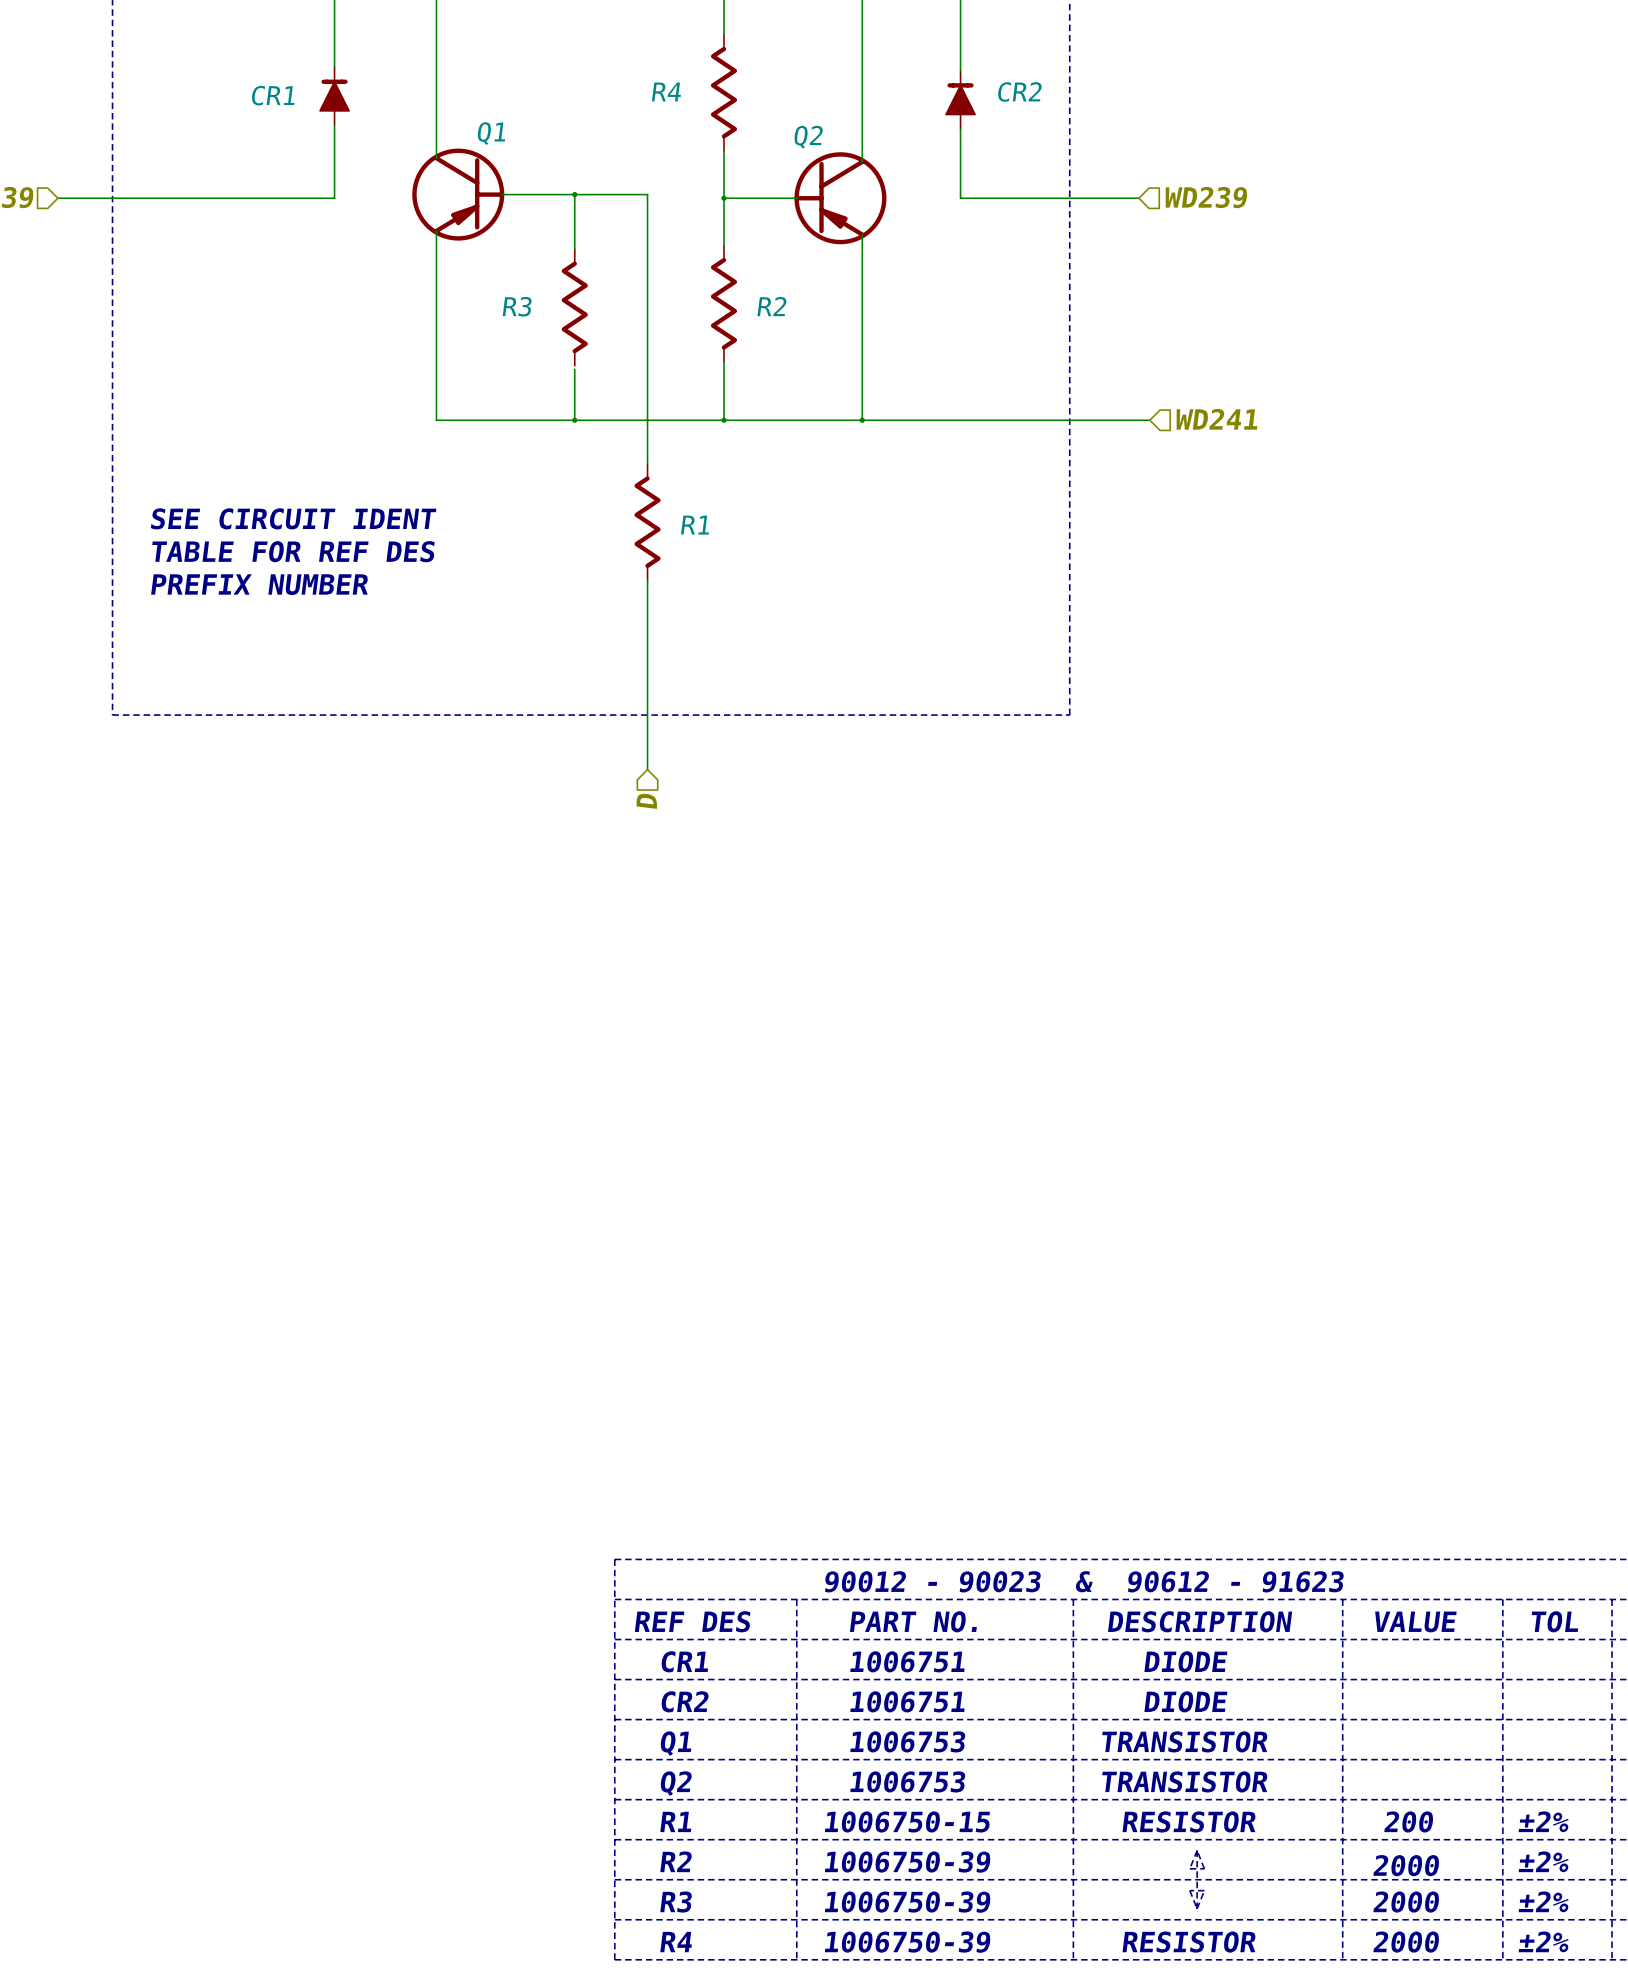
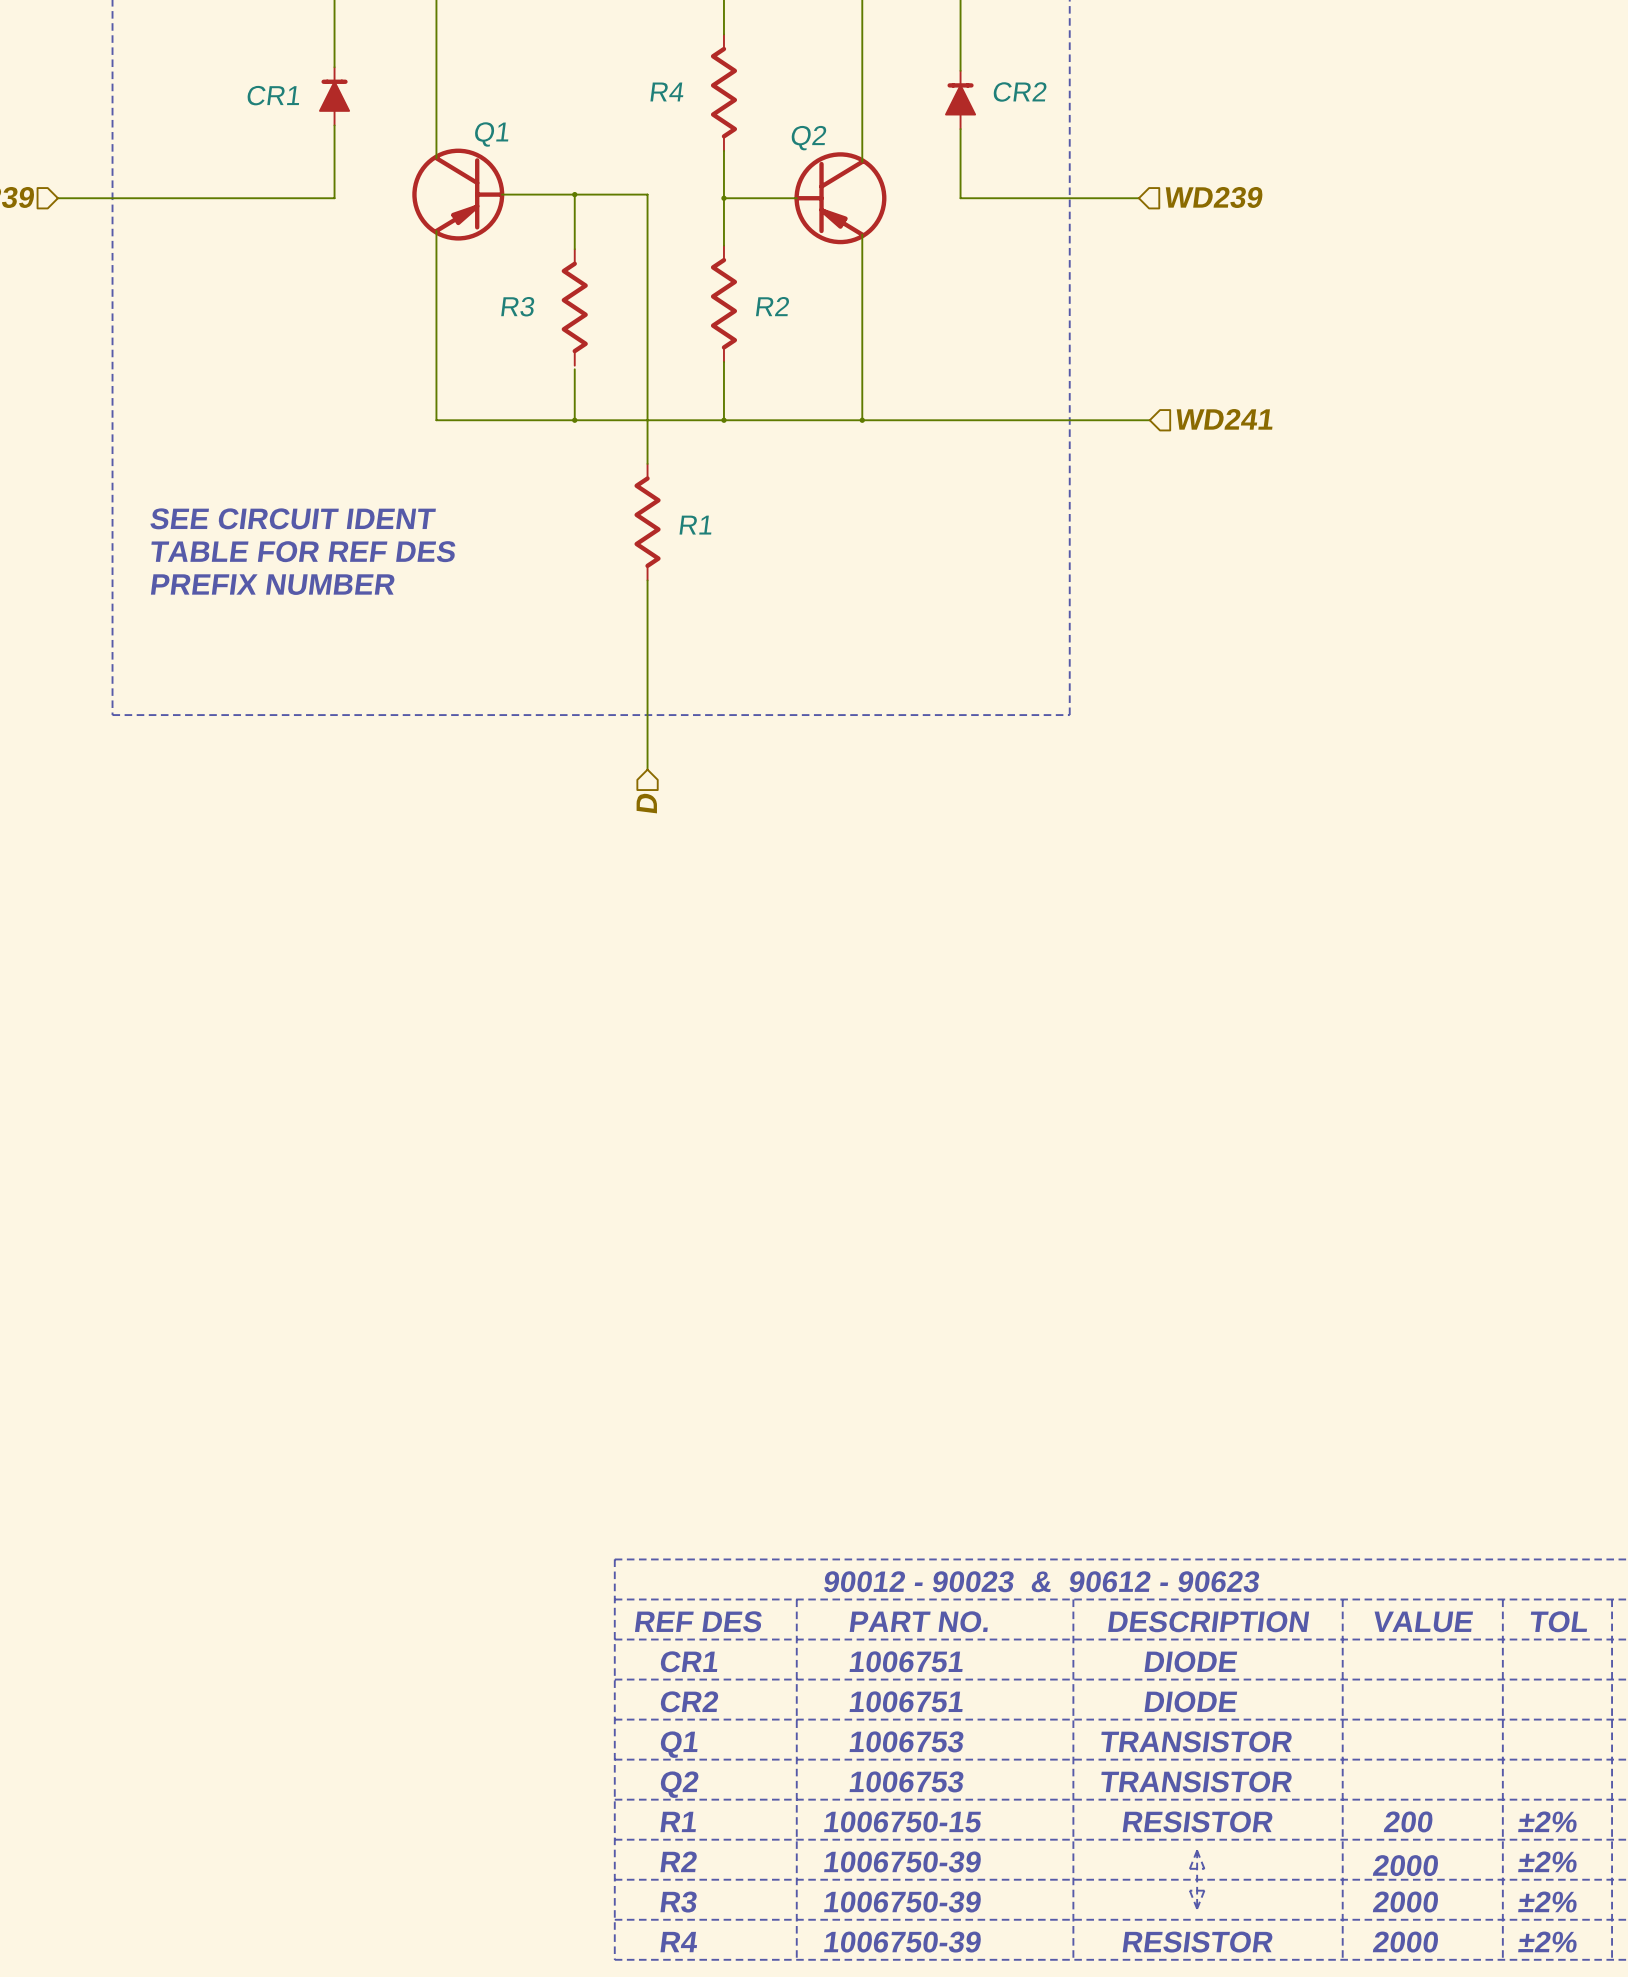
text: 90012 - 90023 & 90612 - 91623 (1084, 1581) -> 90012 - 90023 & 90612 - 90623 (1041, 1581)

